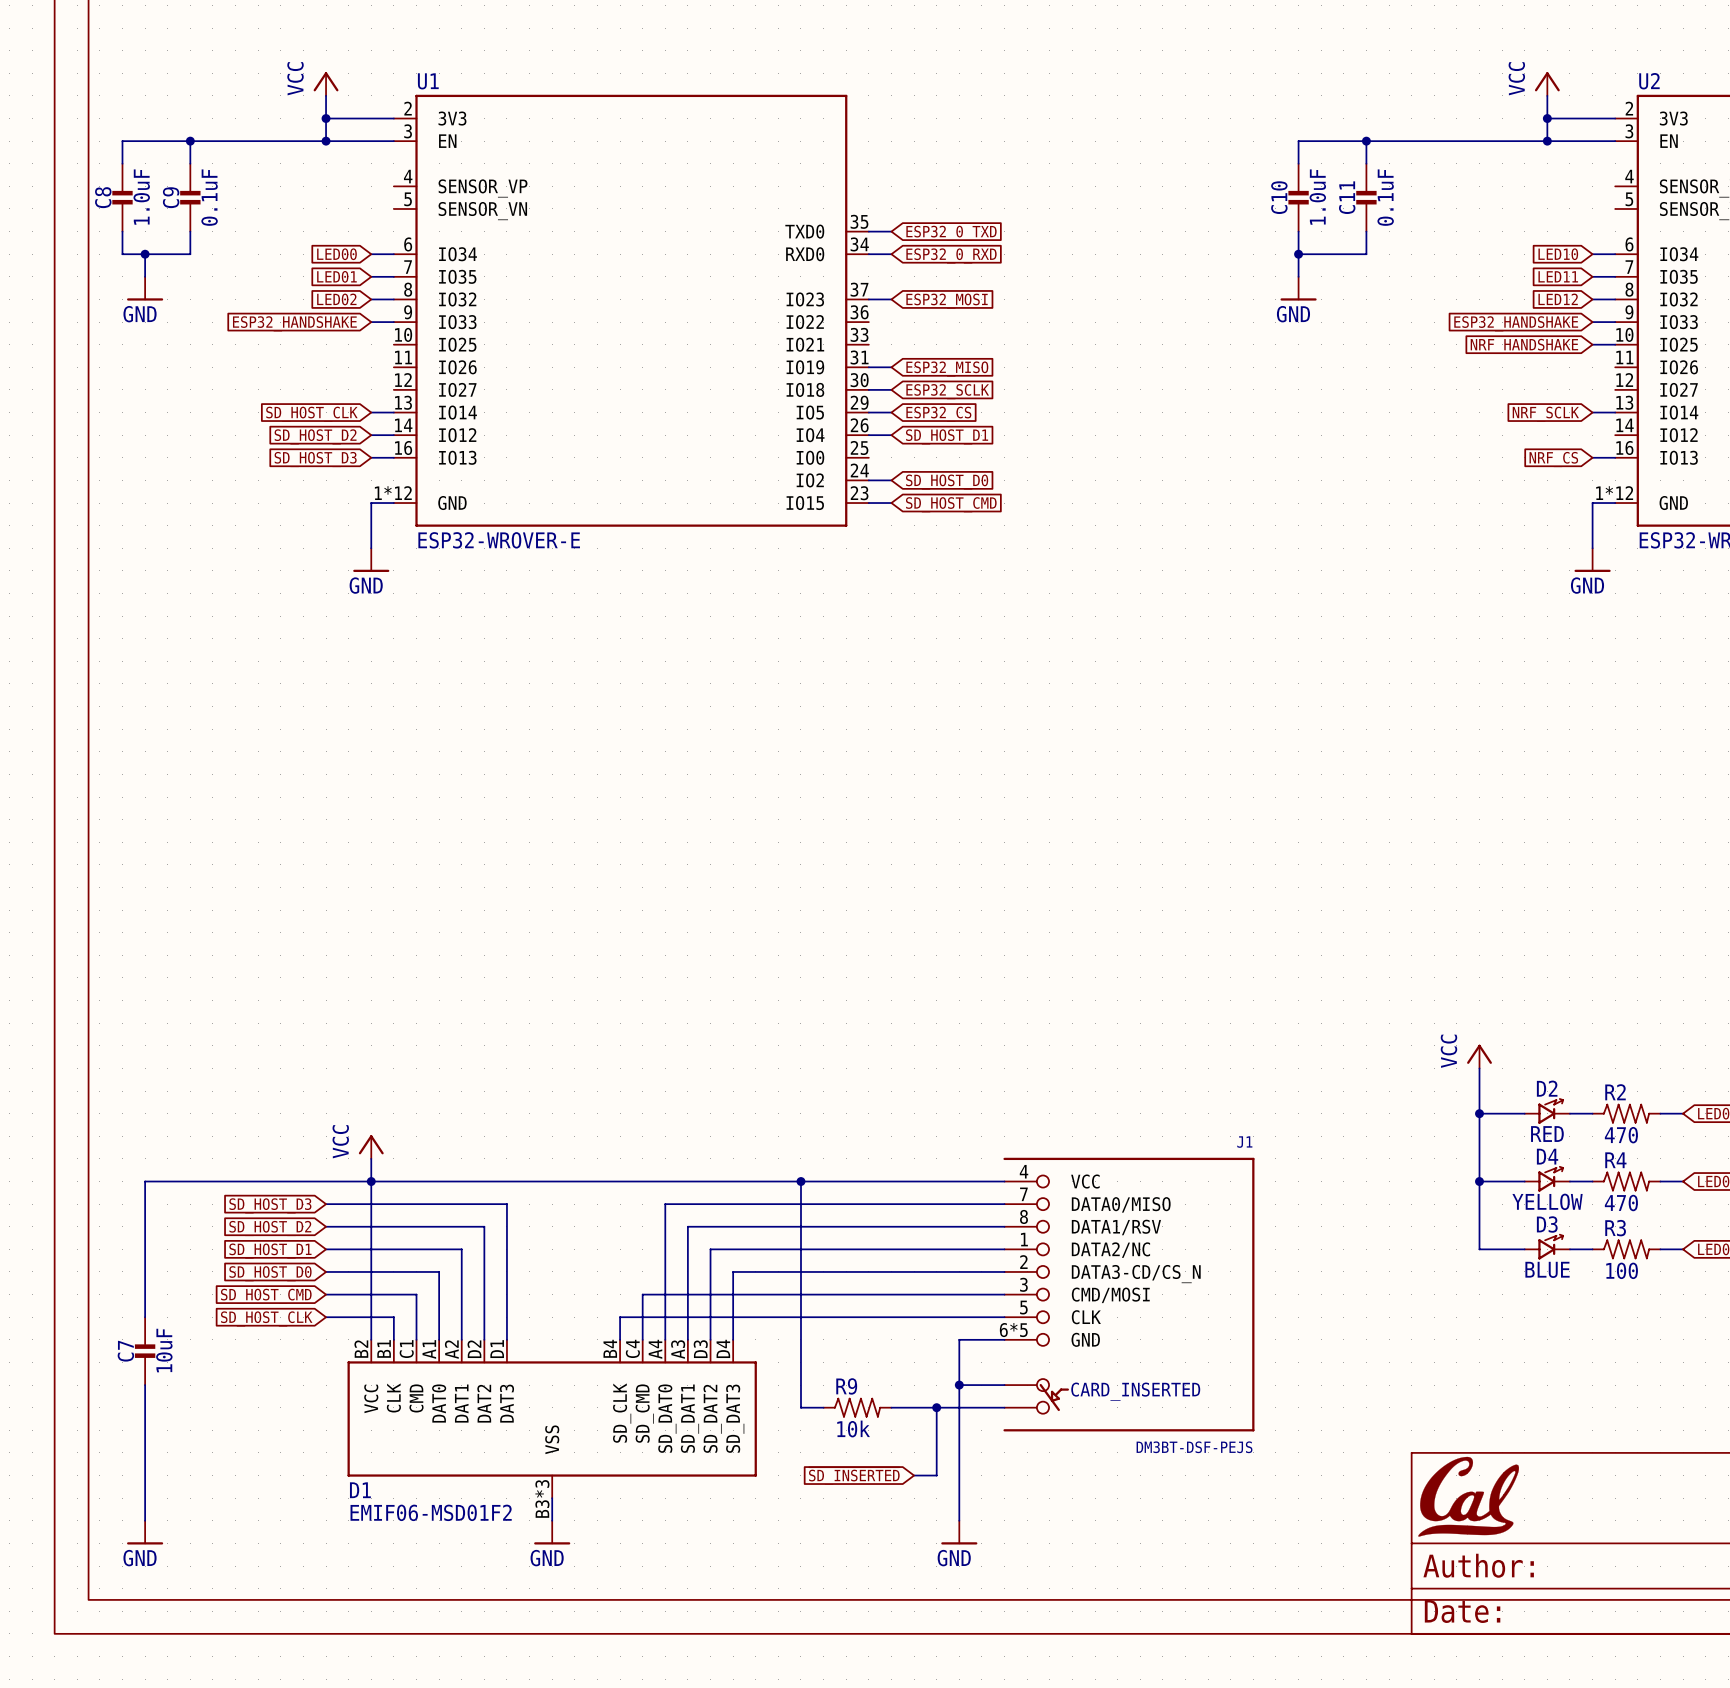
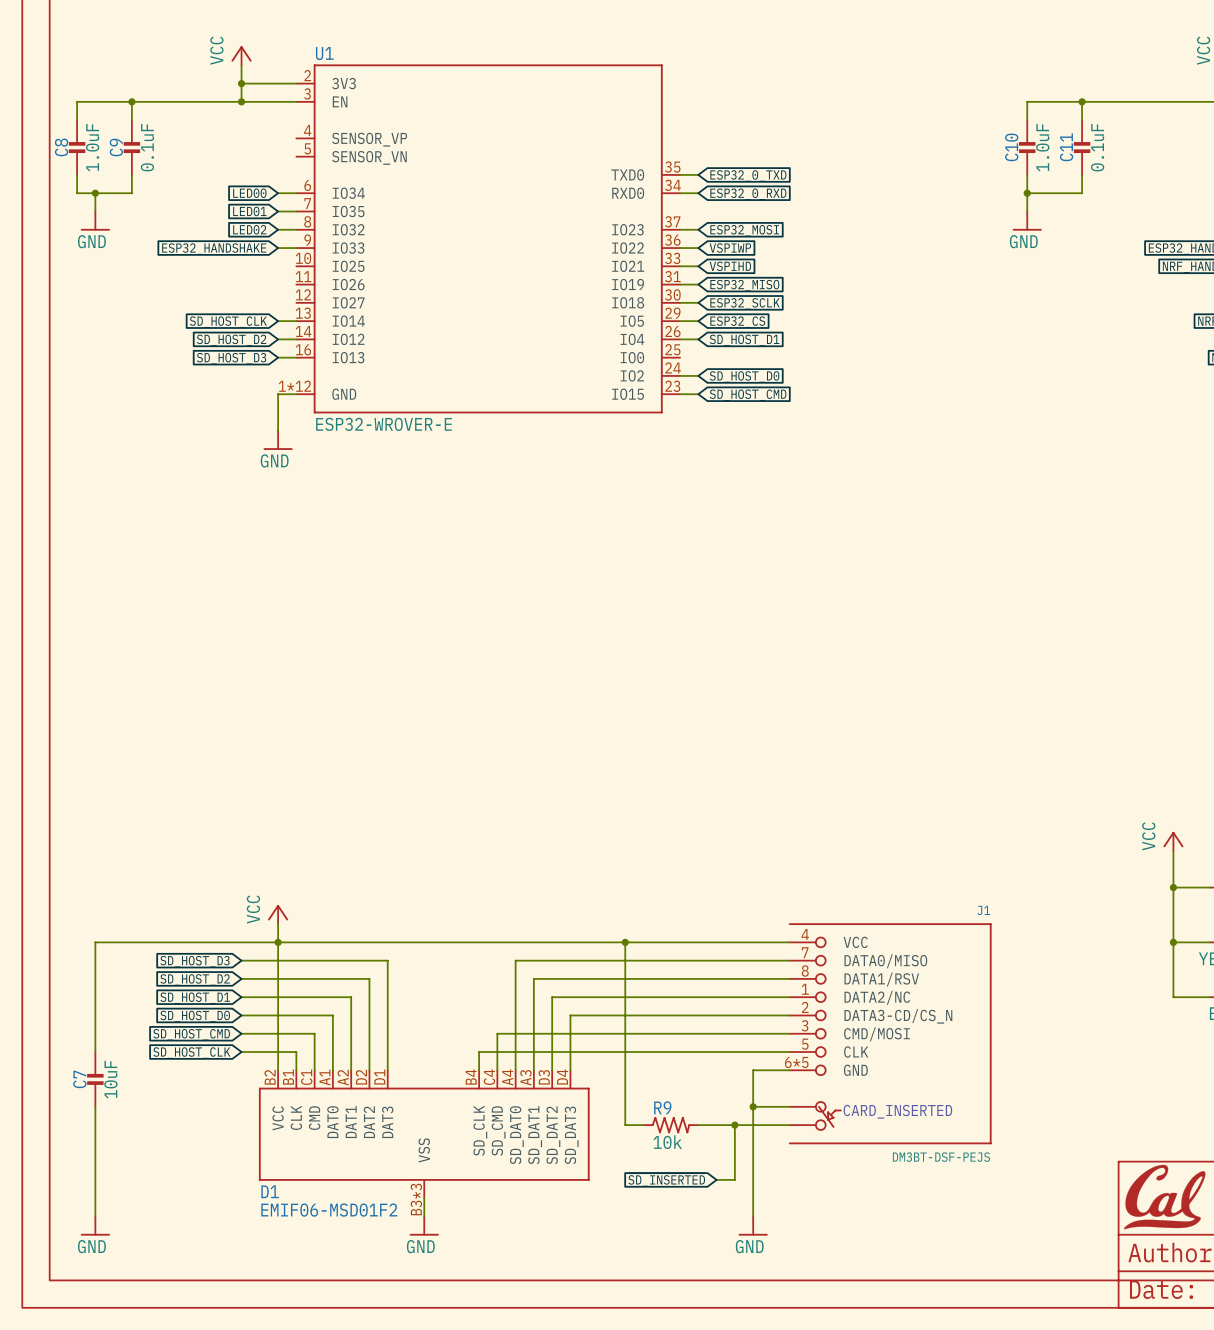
wire: none -> (680, 248) (698, 248)
global label: none -> VSPIWP (730, 248)
wire: none -> (680, 266) (698, 266)
global label: none -> VSPIHD (730, 266)

